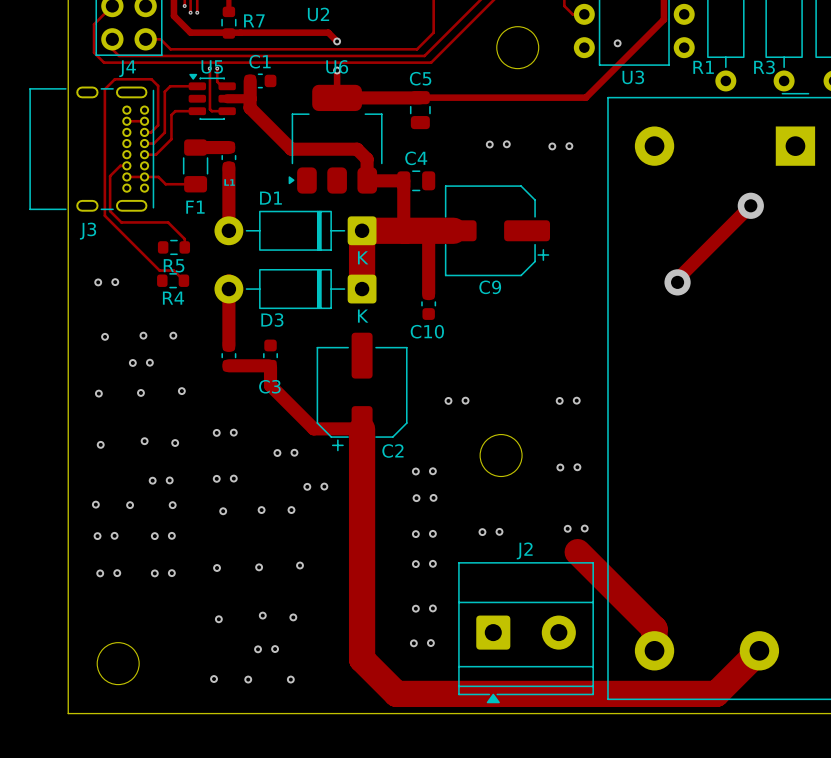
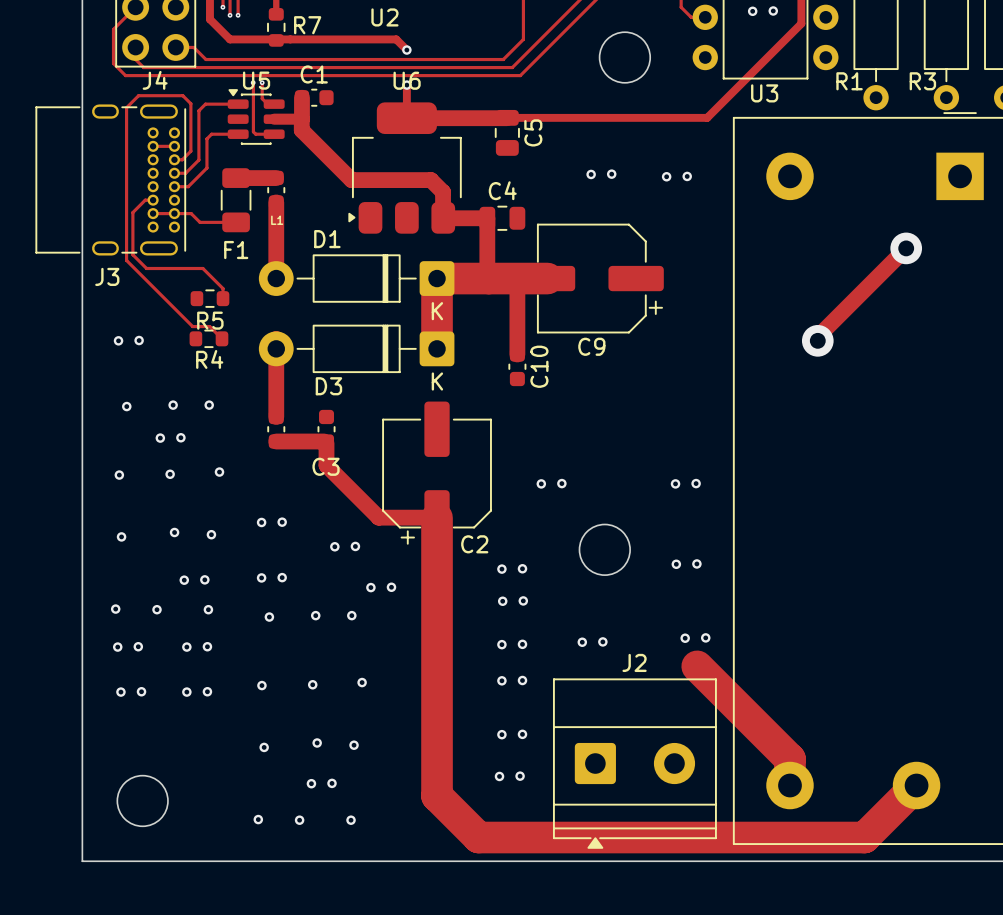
via: none -> (752, 11)
via: none -> (773, 10)
via: (617, 43) -> none
C5 name rotation: 0° (420, 78) -> 90° counterclockwise (533, 132)
C5 name position: C5 (420, 78) -> C5 (533, 132)
C10 name rotation: 0° (427, 331) -> 90° counterclockwise (539, 366)

